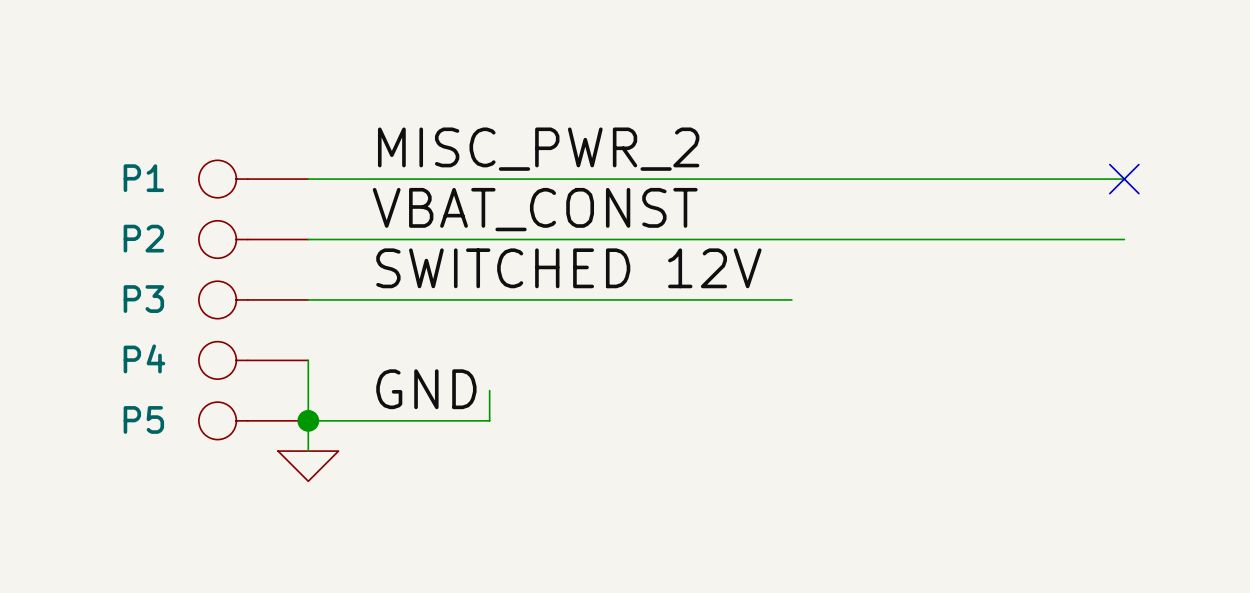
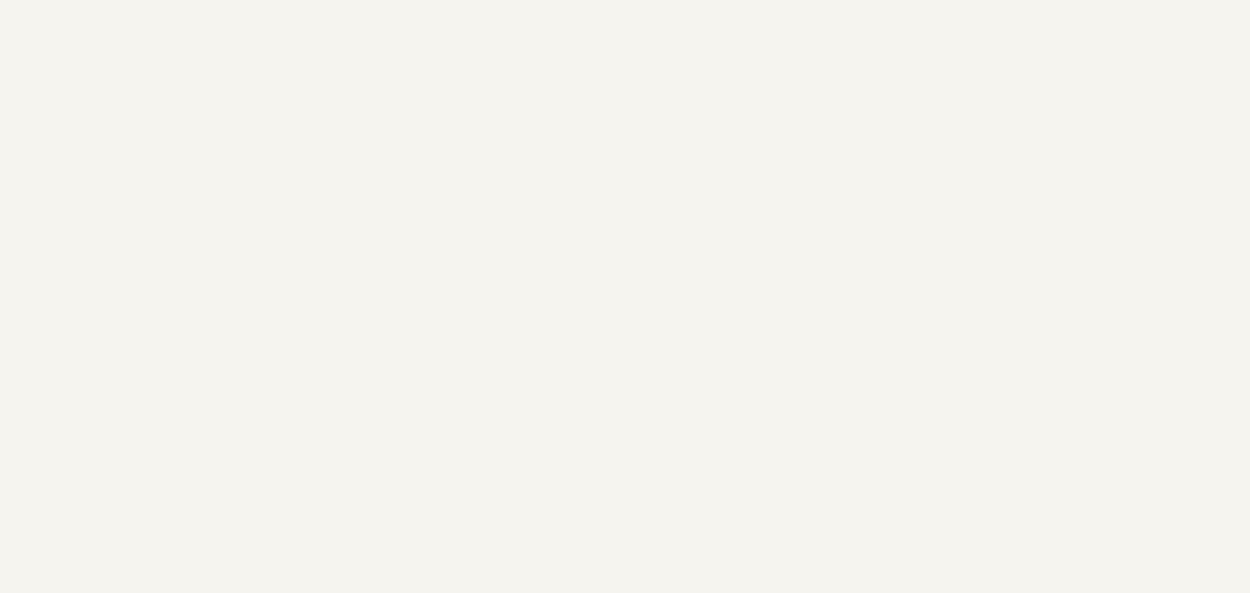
label: MISC_PWR_2 (538, 149) -> none
P1: (253, 179) -> none
wire: (308, 179) (1124, 179) -> none
no-connect mark: (1124, 179) -> none
label: VBAT_CONST (535, 209) -> none
P2: (253, 239) -> none
wire: (308, 239) (1124, 239) -> none
label: SWITCHED 12V (568, 268) -> none
P3: (253, 299) -> none
wire: (308, 299) (791, 299) -> none
P4: (253, 360) -> none
wire: (308, 360) (308, 451) -> none
label: GND (426, 389) -> none
wire: (489, 390) (489, 420) (308, 420) -> none
P5: (253, 420) -> none
junction: (308, 420) -> none
power symbol: (308, 466) -> none

